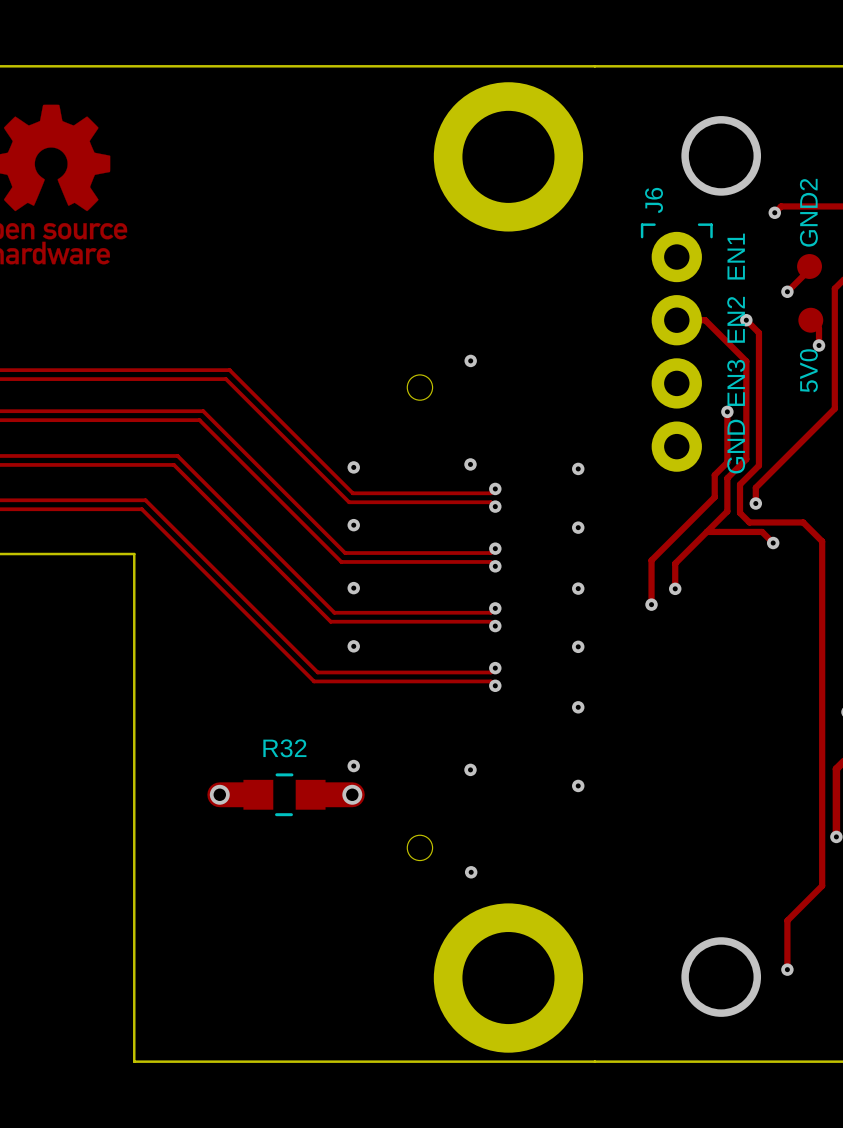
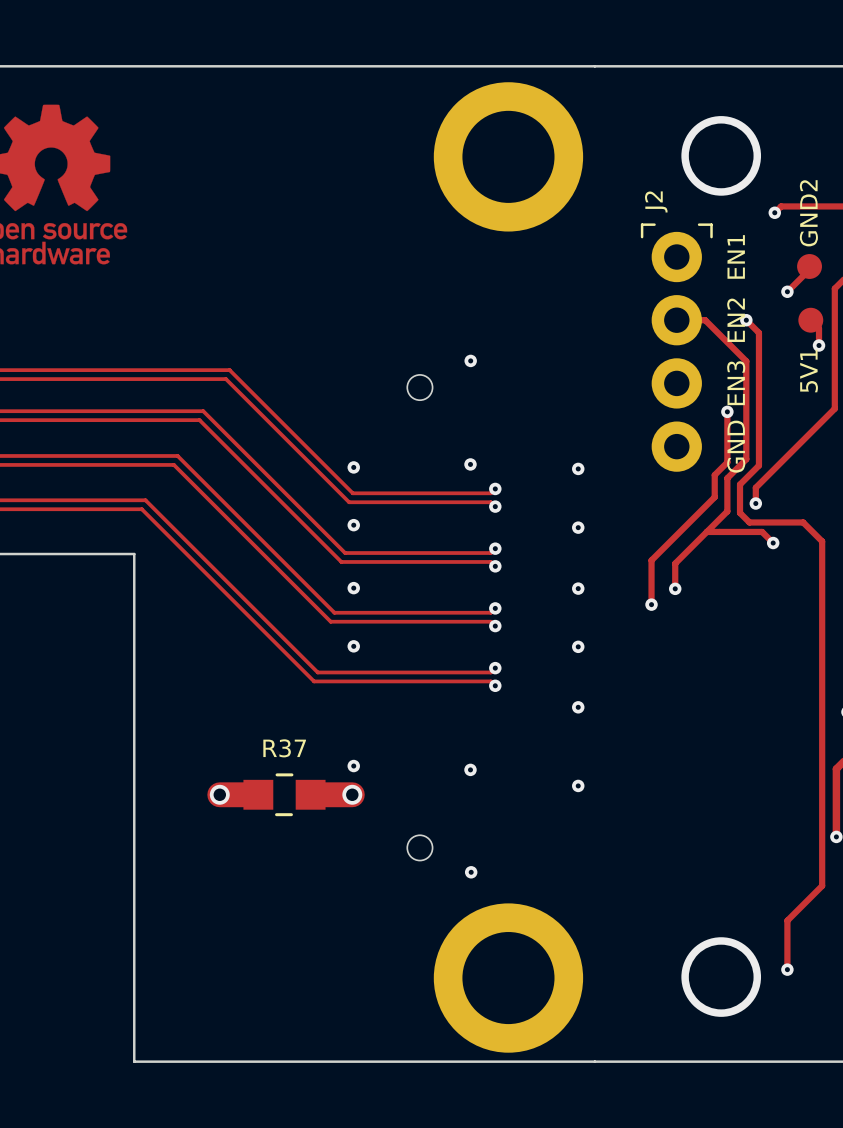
J6 name: J6 (654, 200) -> J2 (656, 201)
5V0 name: 5V0 (808, 370) -> 5V1 (809, 370)
R32 name: R32 (284, 748) -> R37 (284, 748)

